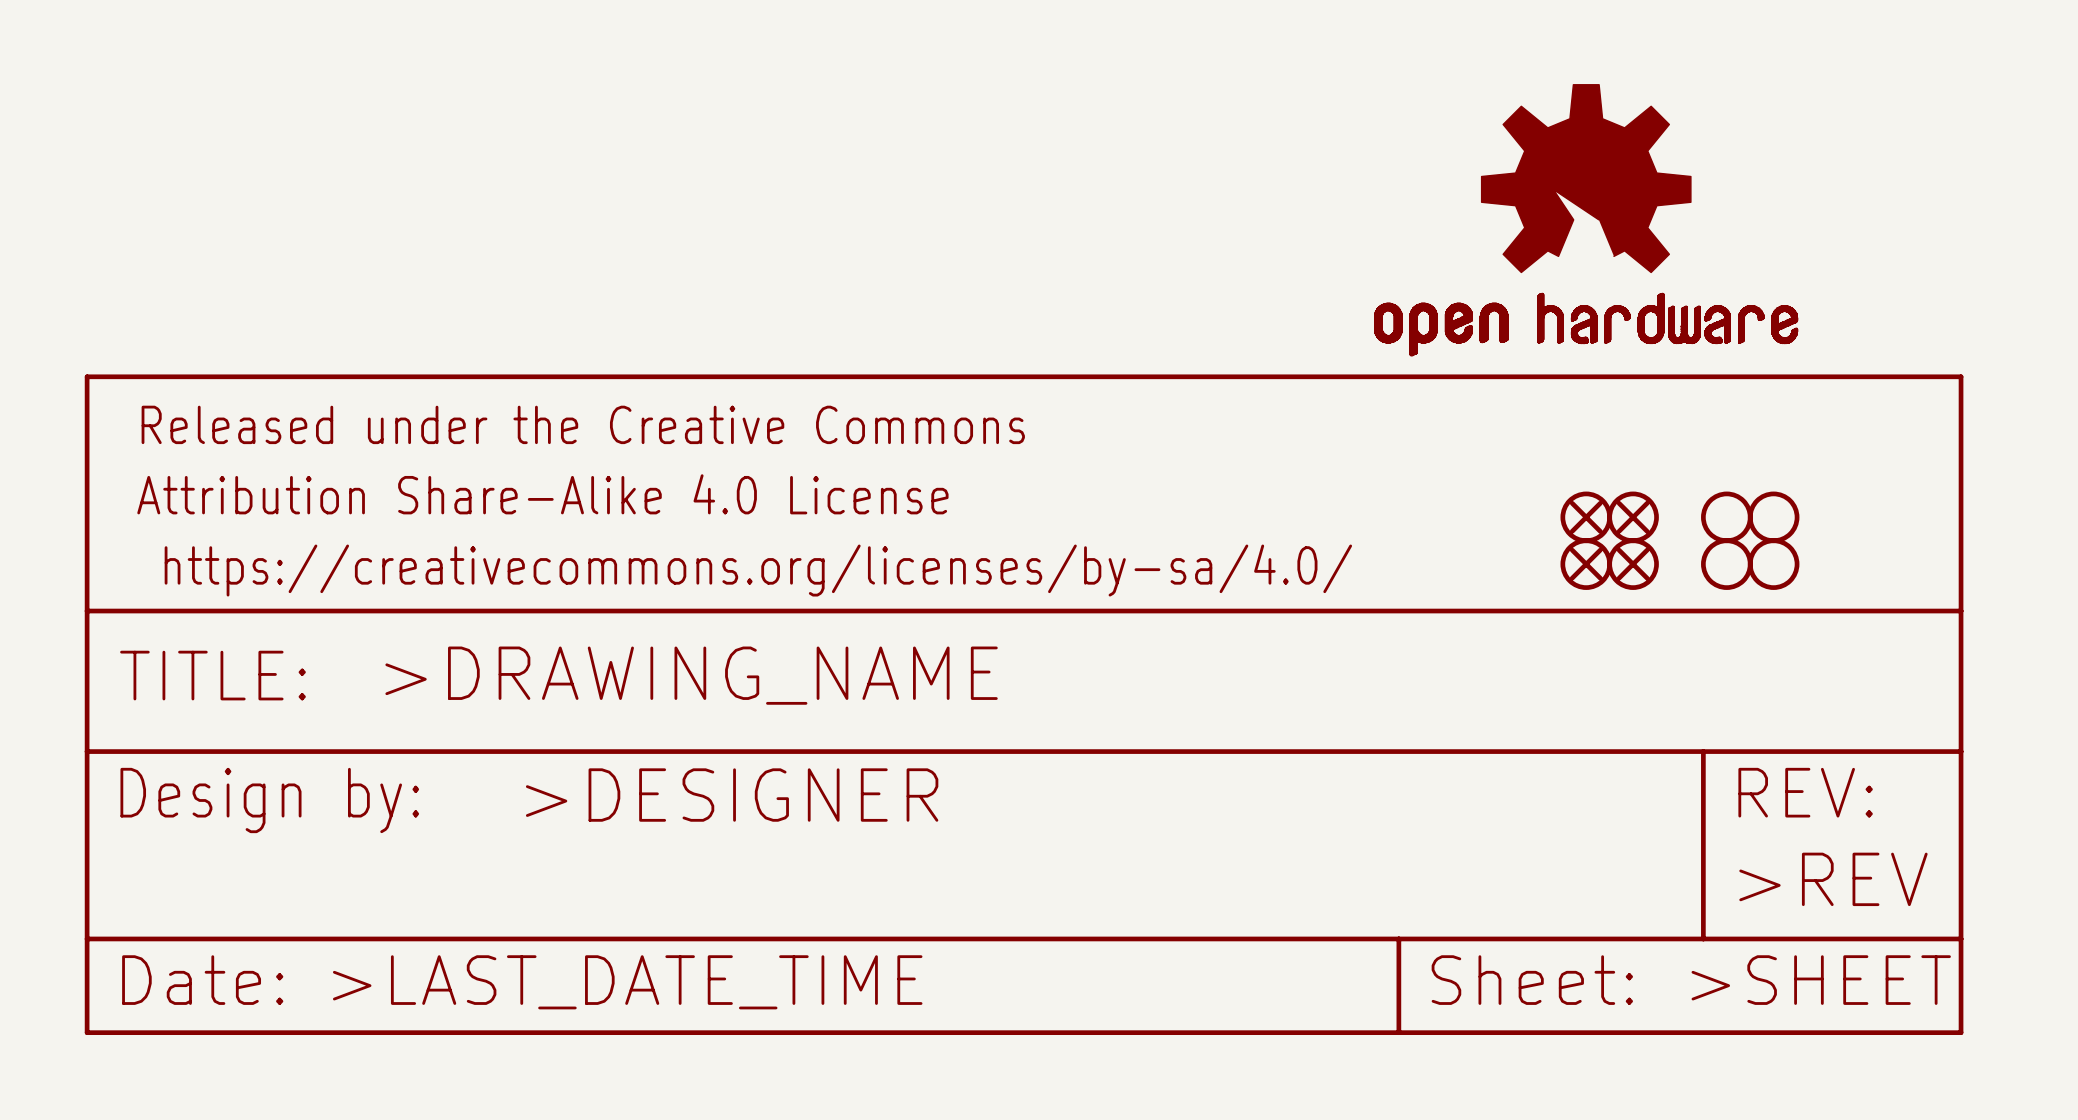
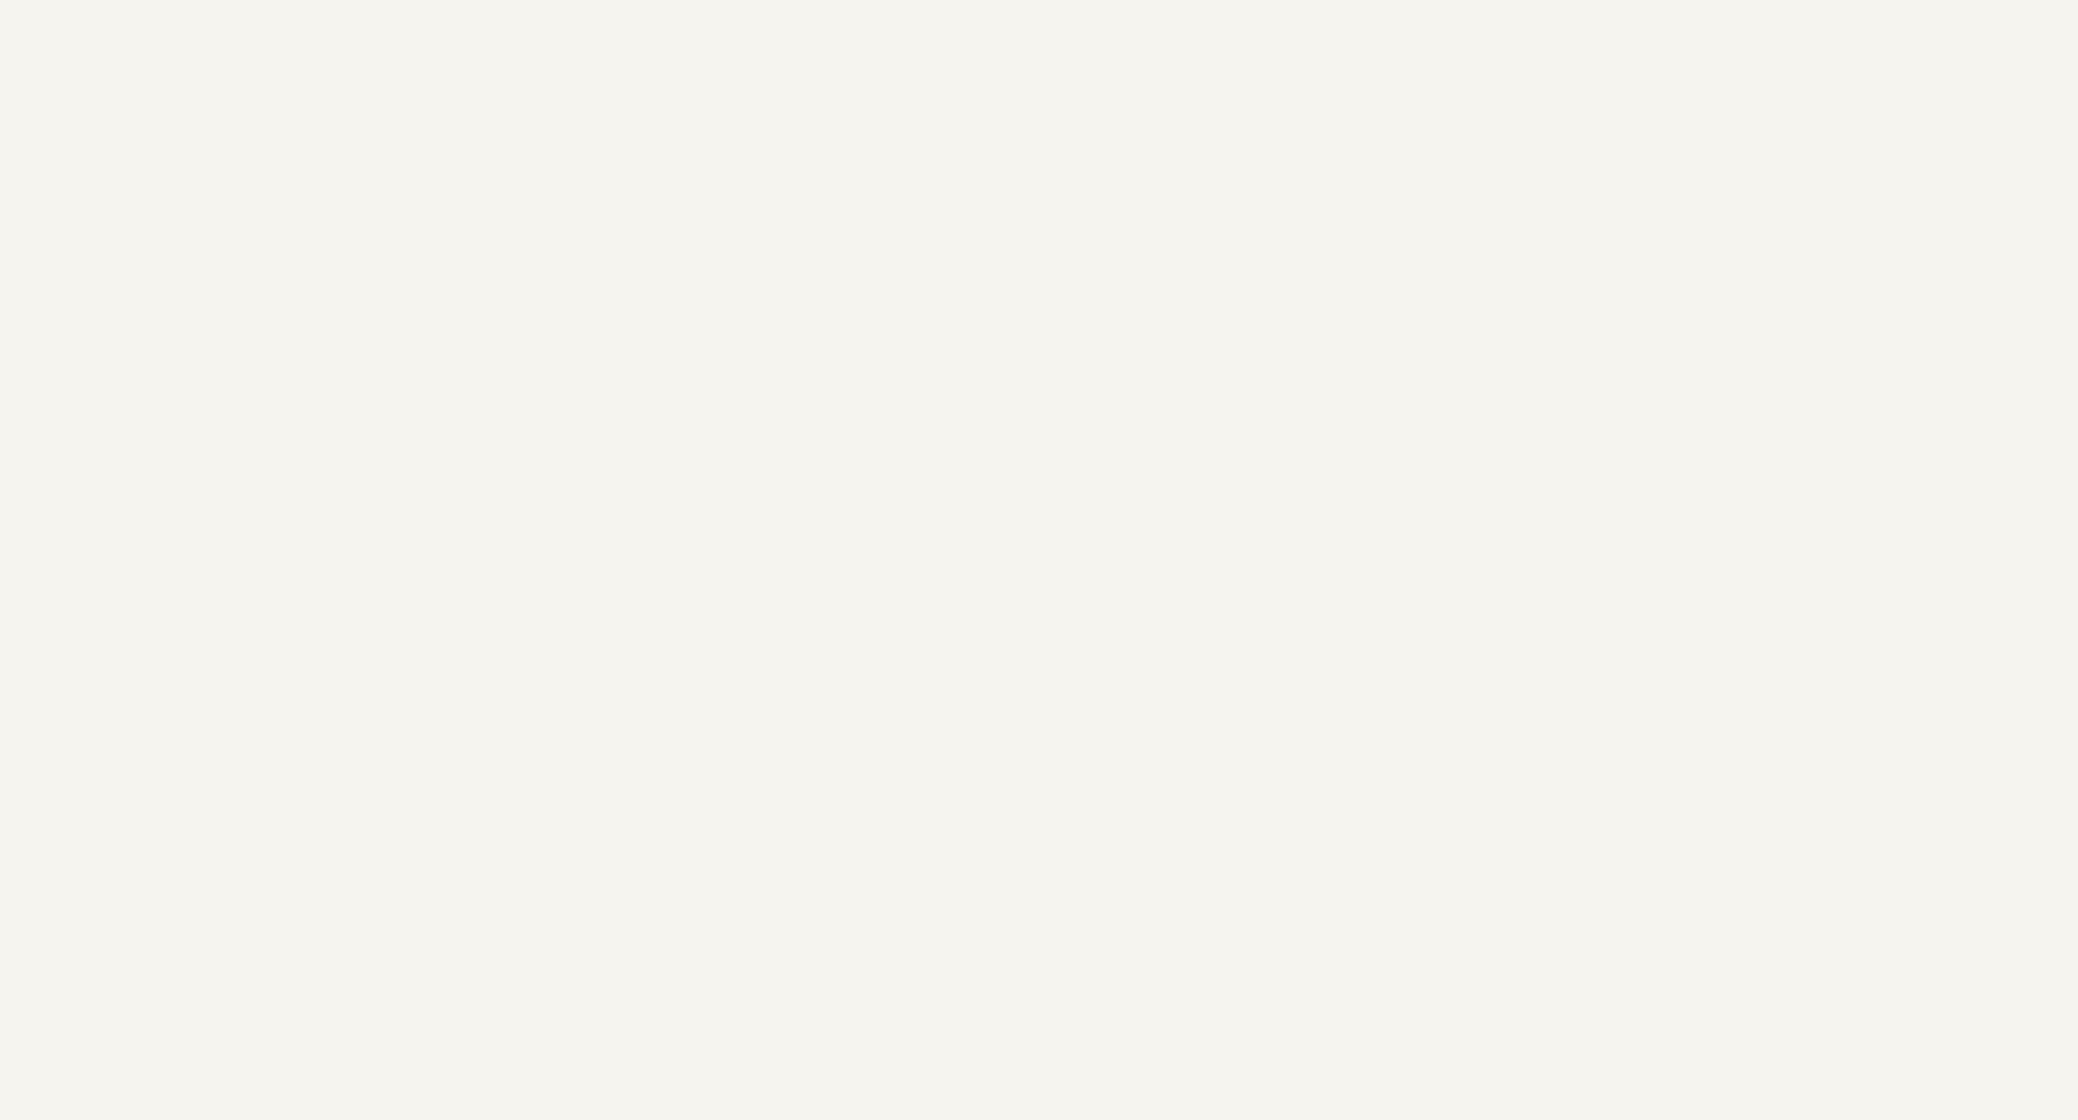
part: (1586, 220) -> none
part: (1586, 517) -> none
part: (1633, 517) -> none
part: (1726, 517) -> none
part: (1773, 517) -> none
part: (1586, 564) -> none
part: (1633, 564) -> none
part: (1726, 564) -> none
part: (1773, 564) -> none
part: (1024, 704) -> none

